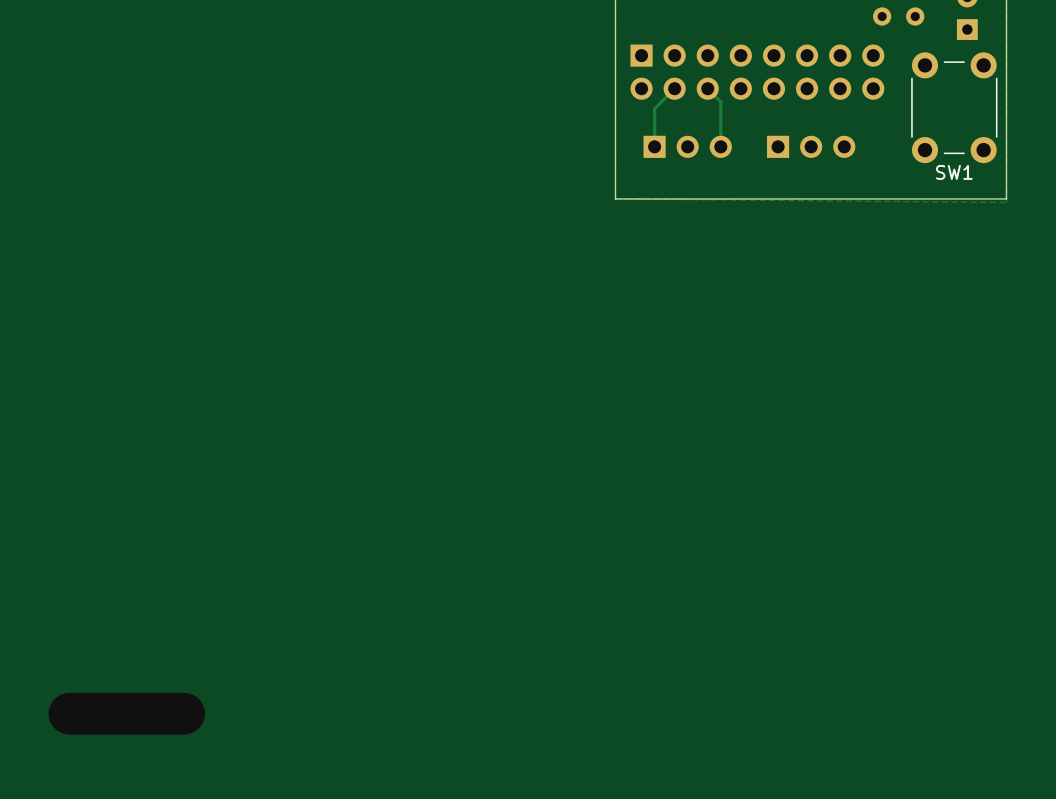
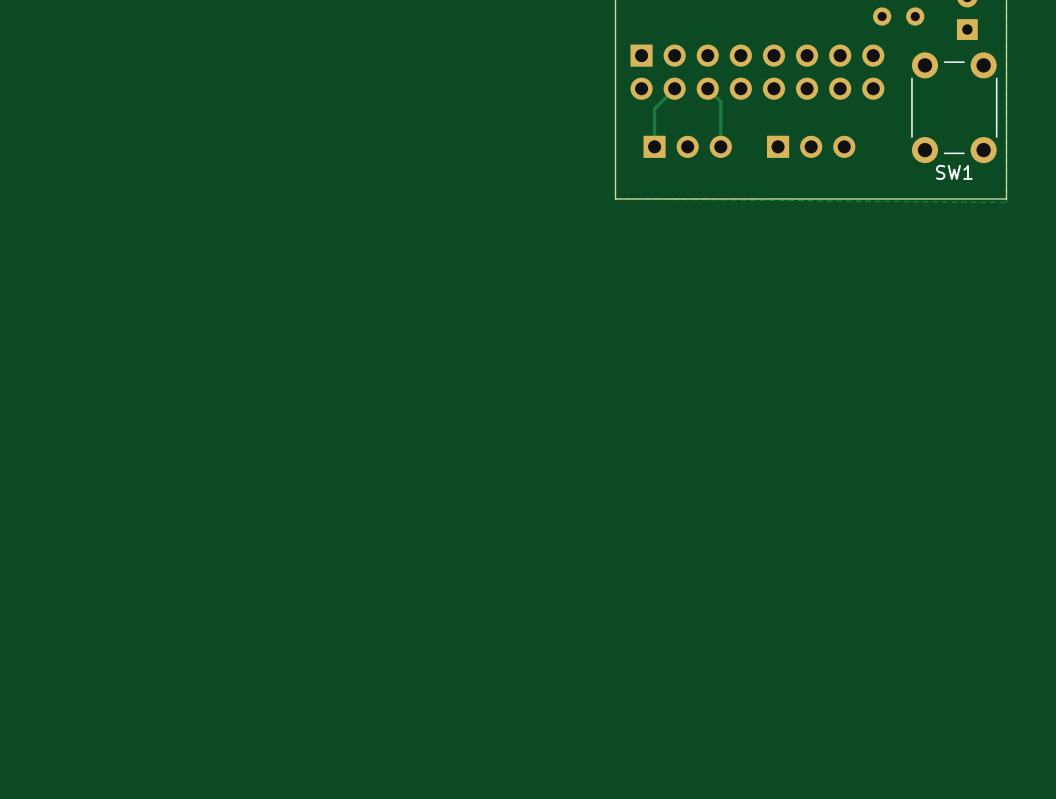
part: (126, 713) -> none

